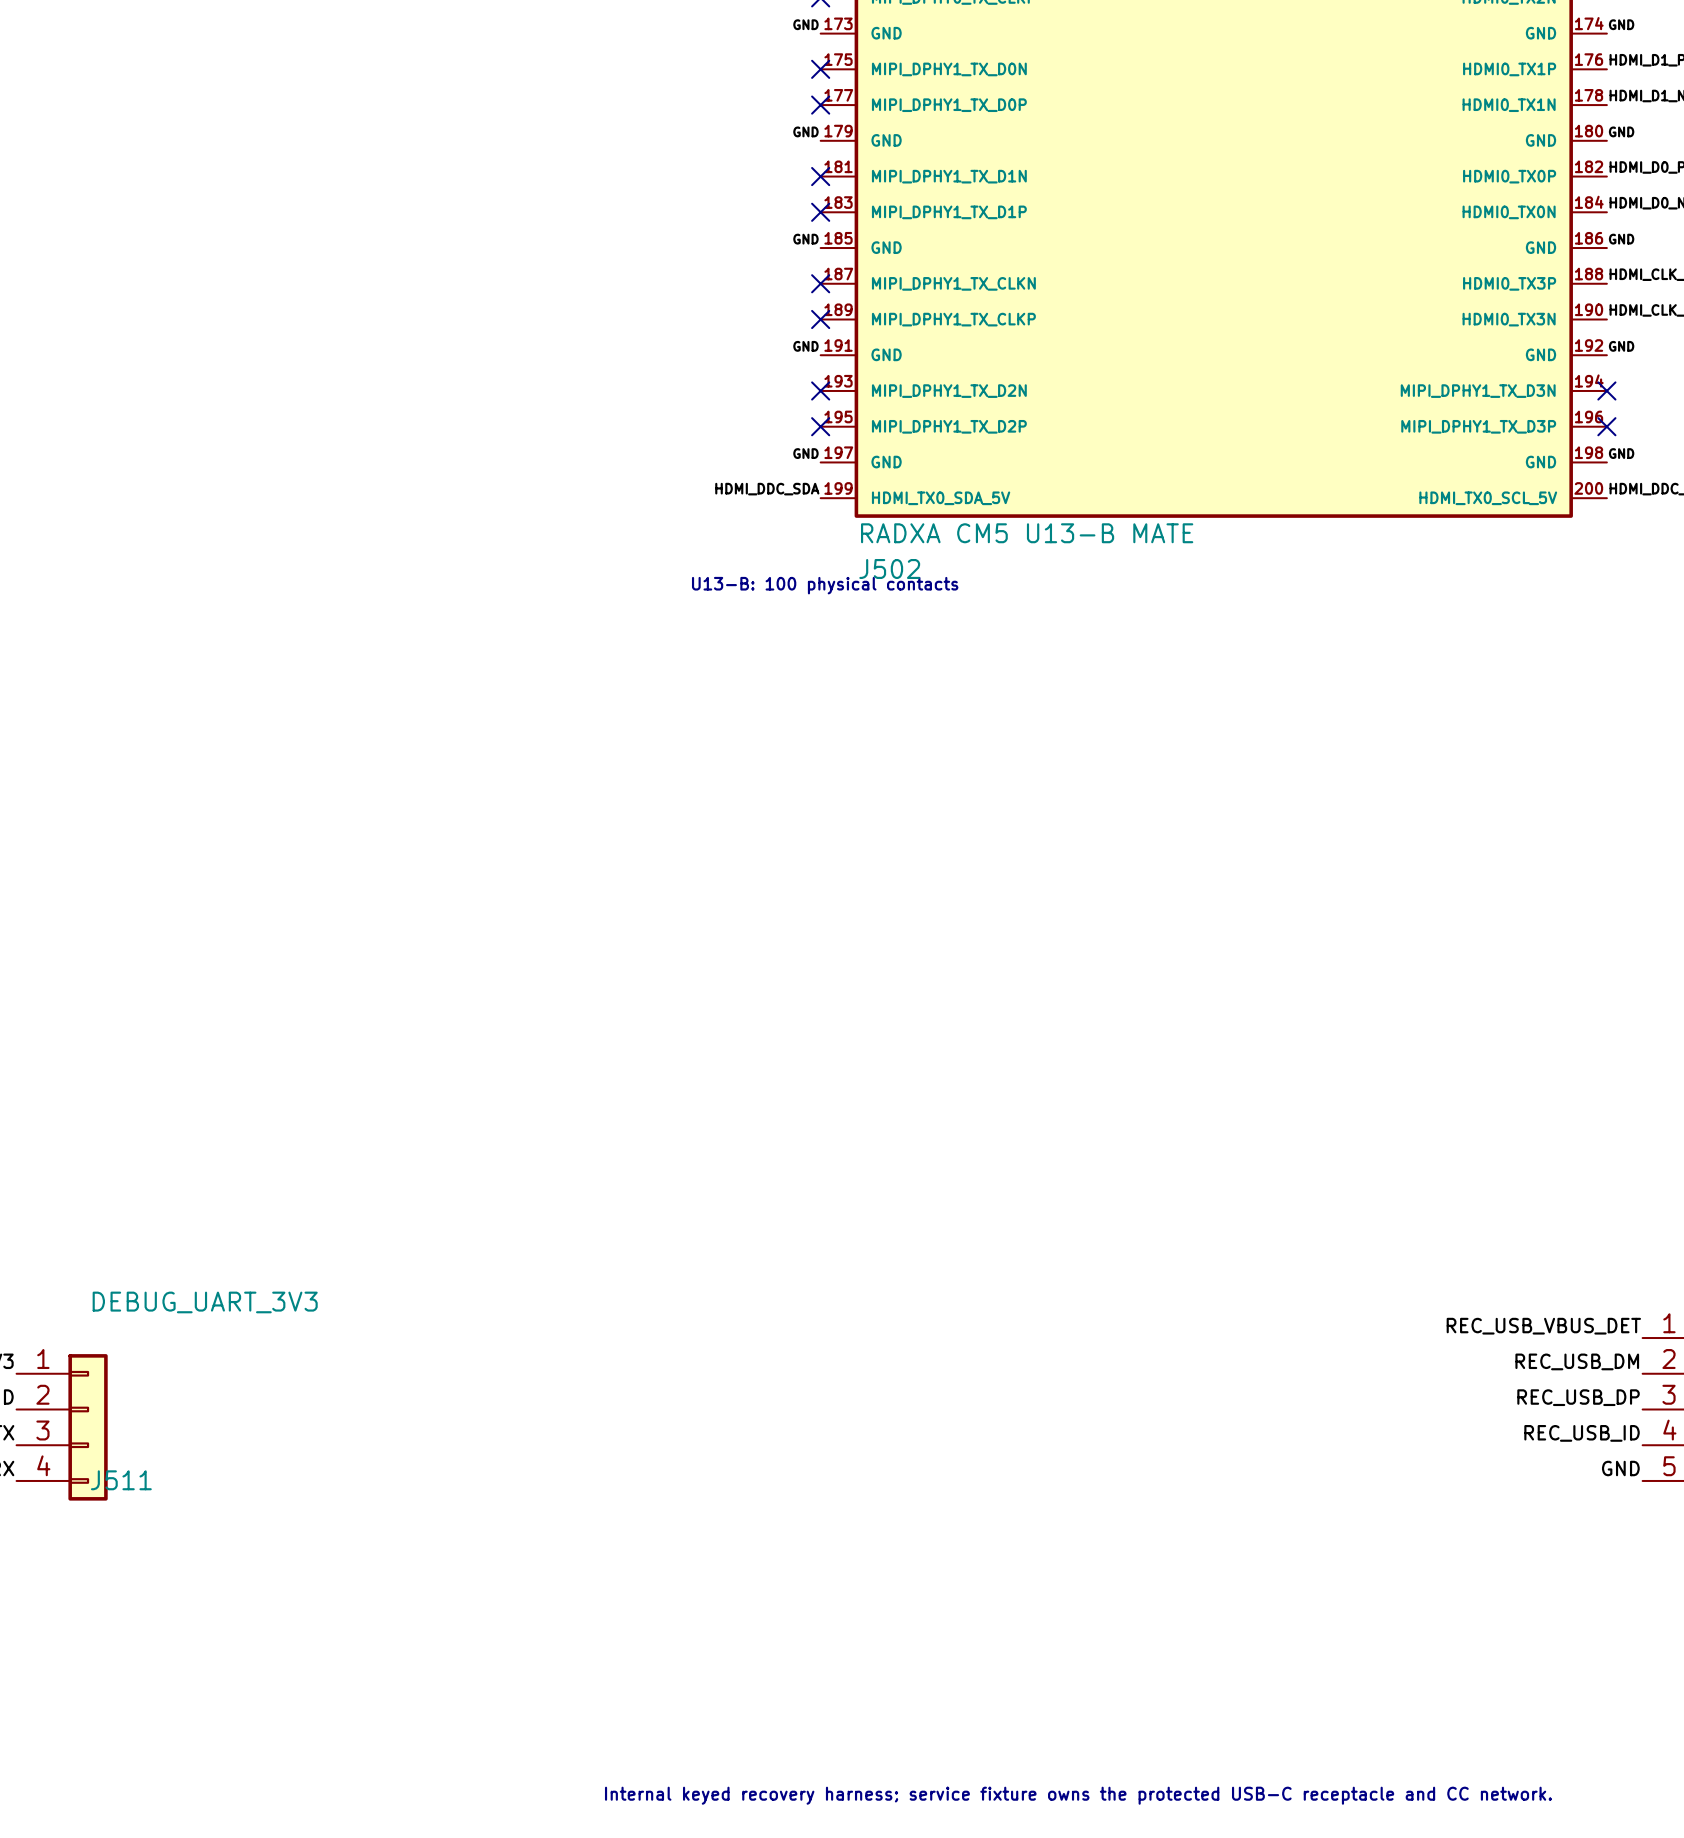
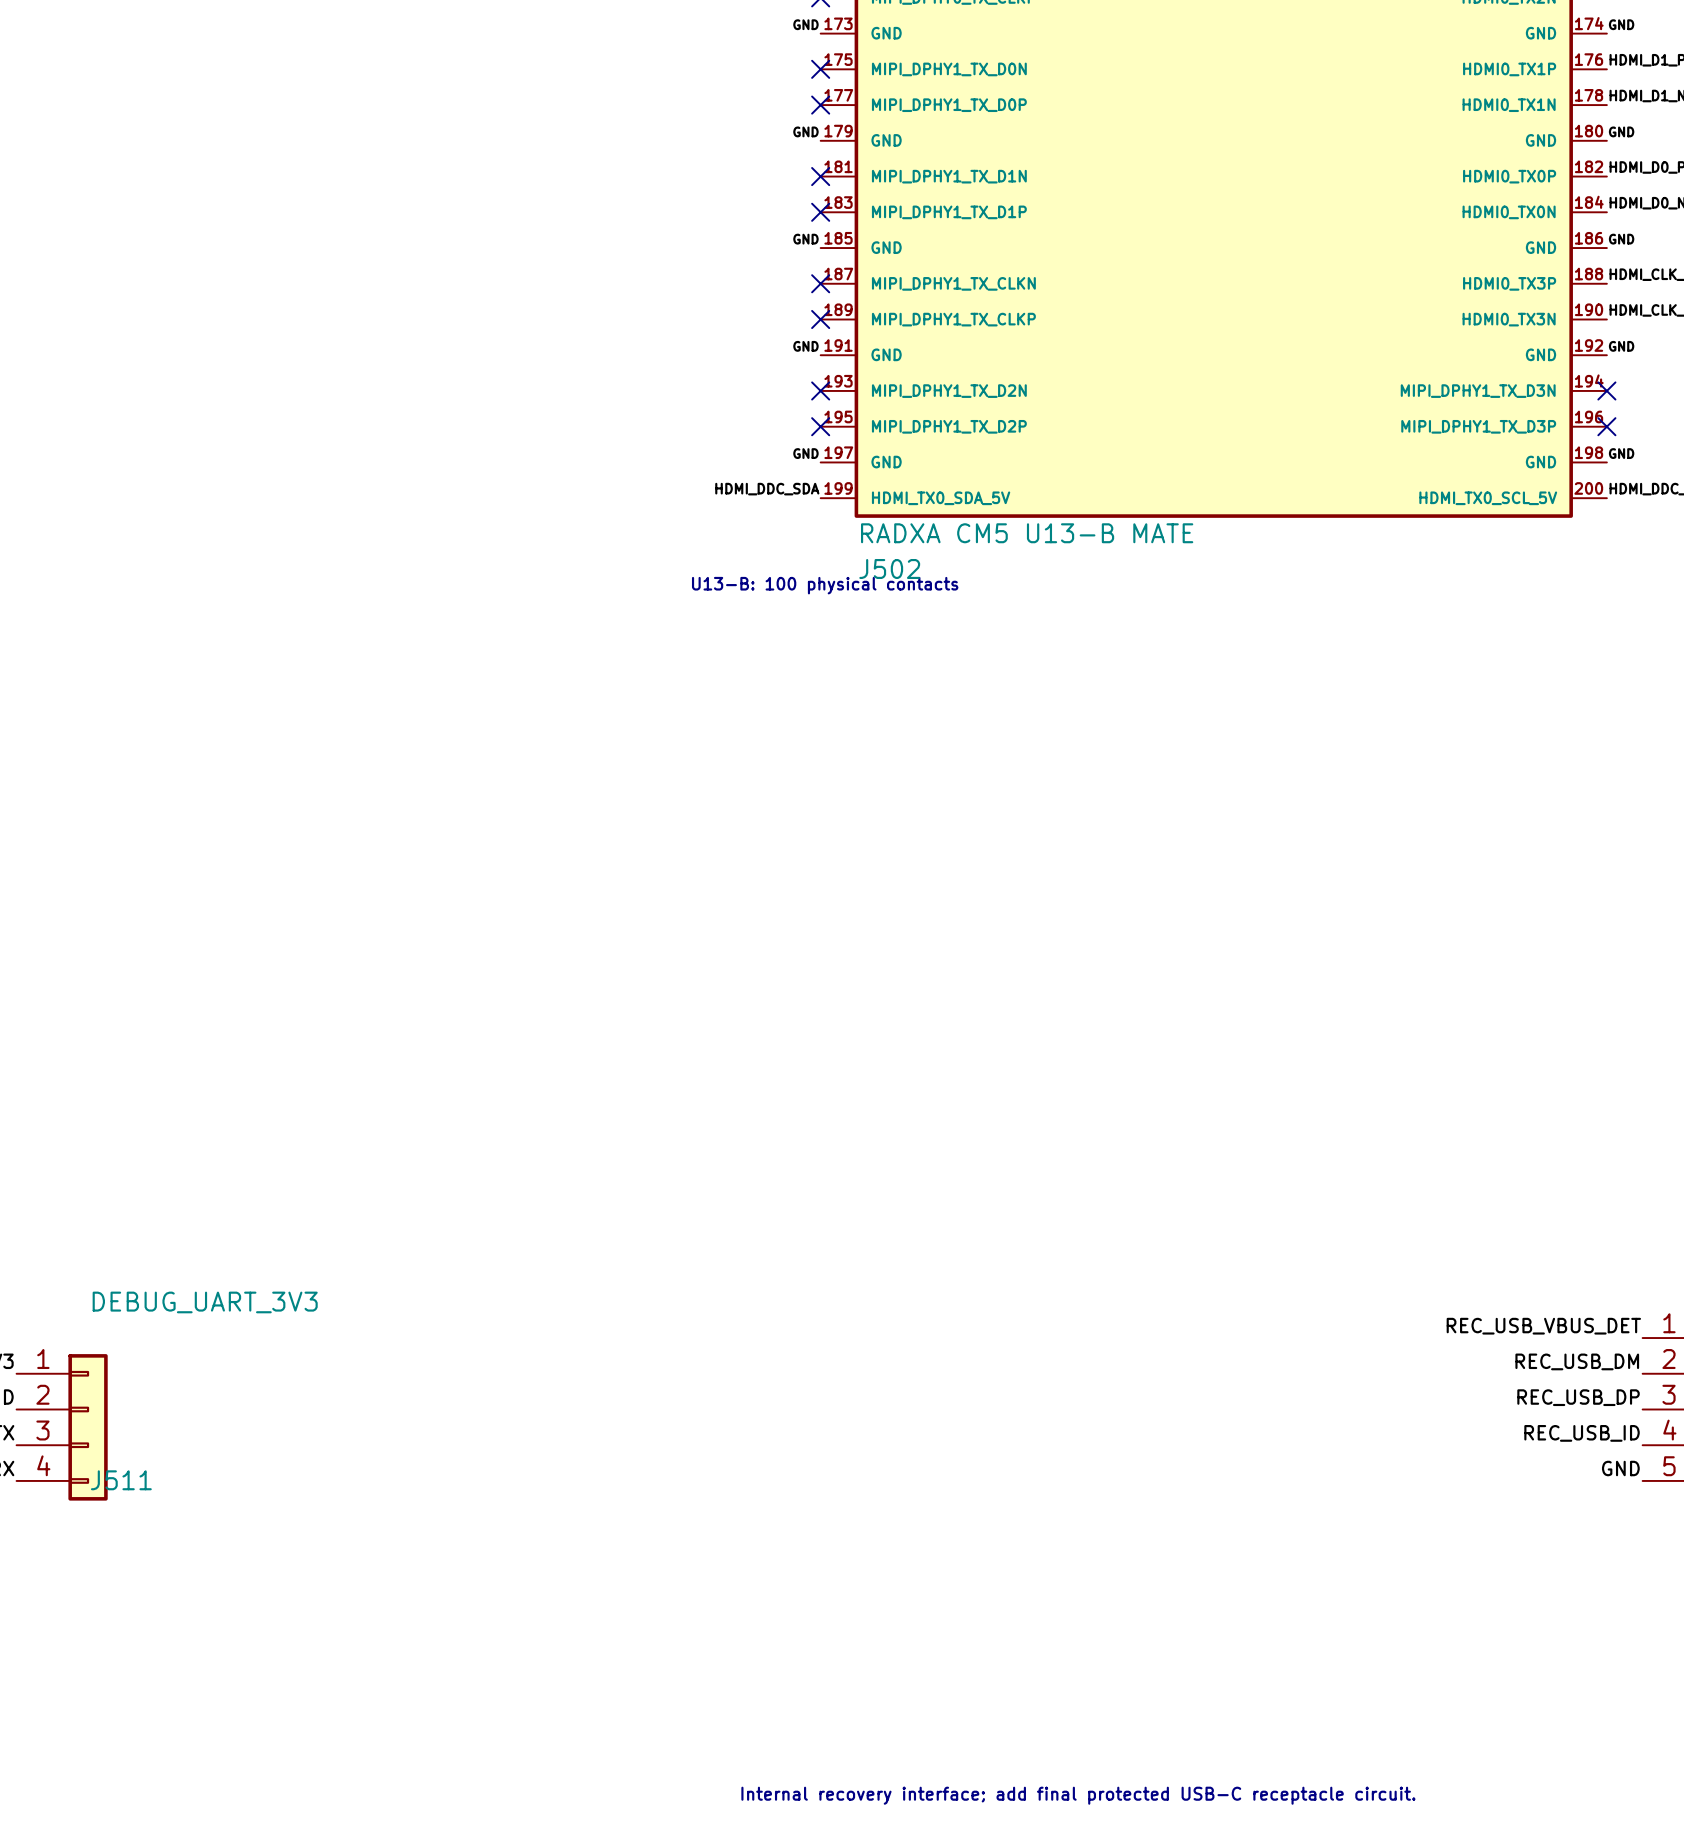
text: Internal keyed recovery harness; service fixture owns the protected USB-C receptacle and CC network. (1078, 1795) -> Internal recovery interface; add final protected USB-C receptacle circuit. (1078, 1795)

